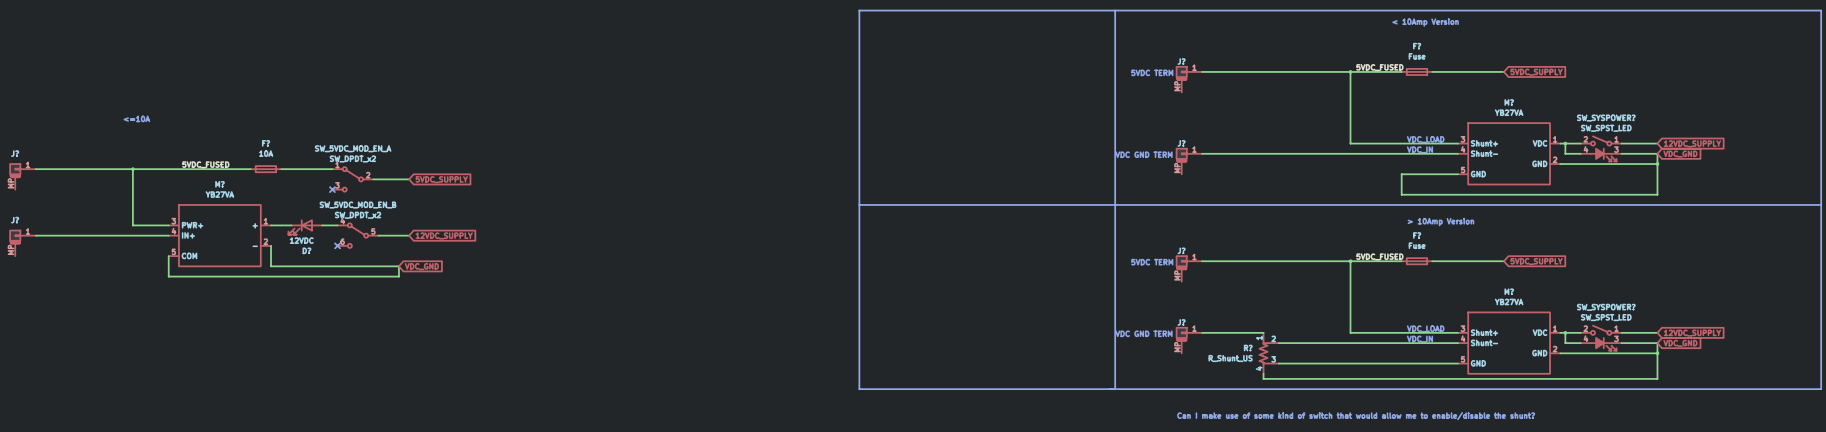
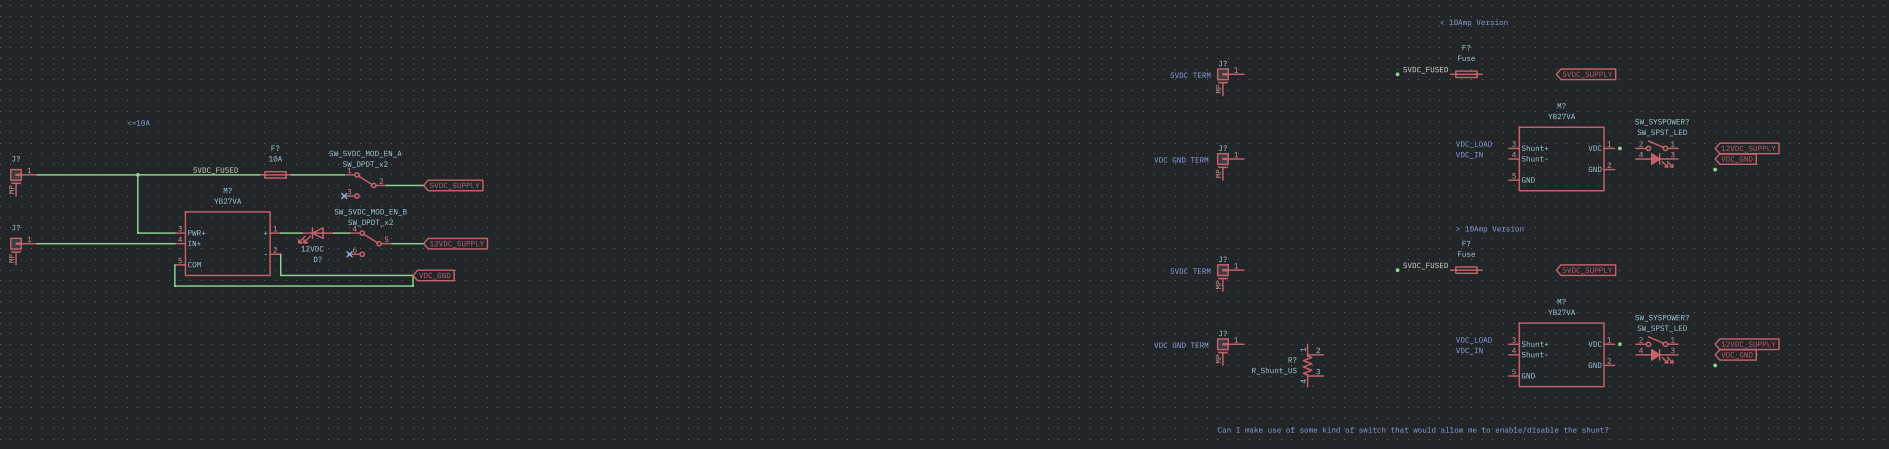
line: (859, 10) (1821, 10) (1821, 389) (859, 389) (859, 10) -> none
line: (1115, 10) (1115, 389) -> none
wire: (1202, 71) (1401, 71) -> none
wire: (1350, 71) (1350, 143) (1457, 143) -> none
wire: (1432, 71) (1503, 71) -> none
wire: (1560, 143) (1580, 143) -> none
wire: (1565, 143) (1565, 153) (1580, 153) -> none
wire: (1621, 143) (1657, 143) -> none
wire: (1202, 153) (1457, 153) -> none
wire: (1621, 153) (1657, 153) (1657, 194) (1401, 194) (1401, 174) (1457, 174) -> none
wire: (1560, 164) (1657, 164) -> none
line: (859, 204) (1821, 204) -> none
wire: (1202, 261) (1401, 261) -> none
wire: (1350, 261) (1350, 332) (1457, 332) -> none
wire: (1432, 261) (1503, 261) -> none
wire: (1202, 332) (1263, 332) -> none
wire: (1560, 332) (1580, 332) -> none
wire: (1565, 332) (1565, 343) (1580, 343) -> none
wire: (1621, 332) (1657, 332) -> none
wire: (1278, 343) (1457, 343) -> none
wire: (1621, 343) (1657, 343) (1657, 378) (1263, 378) (1263, 373) -> none
wire: (1560, 353) (1657, 353) -> none
wire: (1278, 363) (1457, 363) -> none

